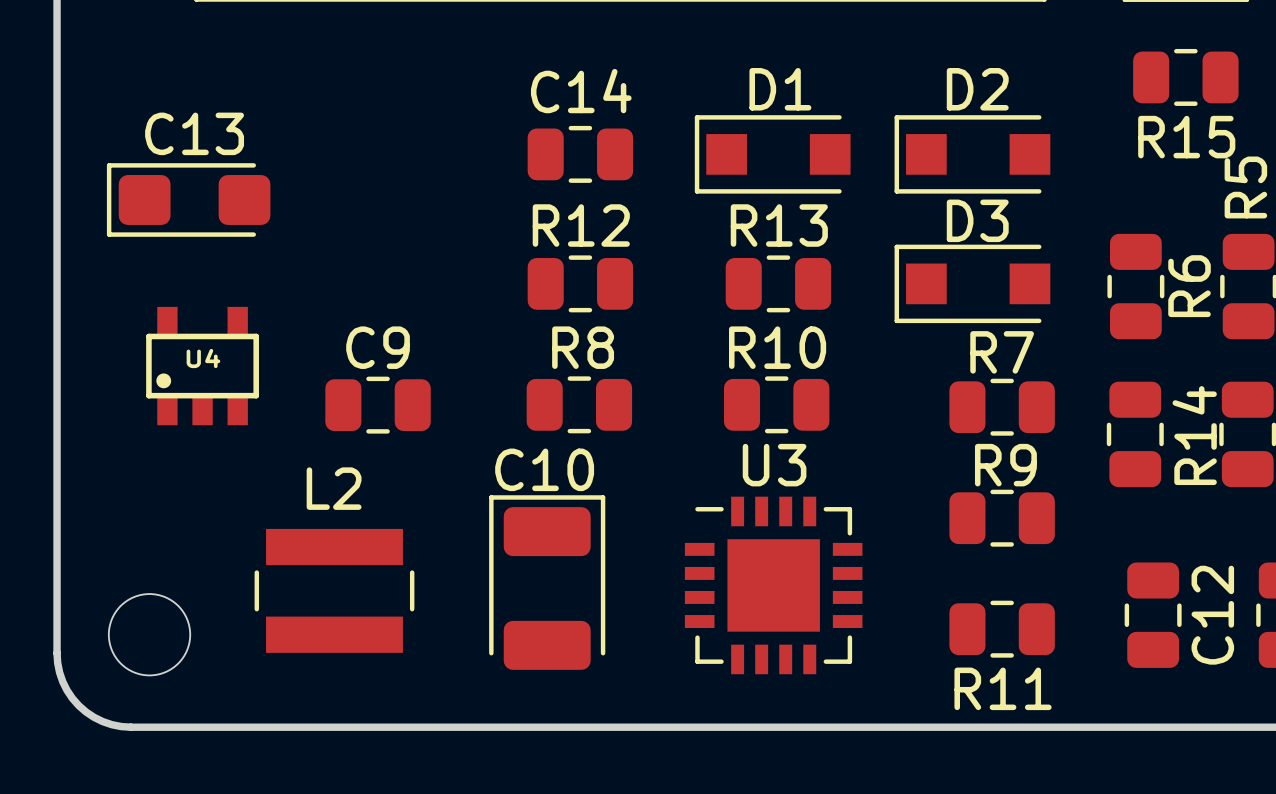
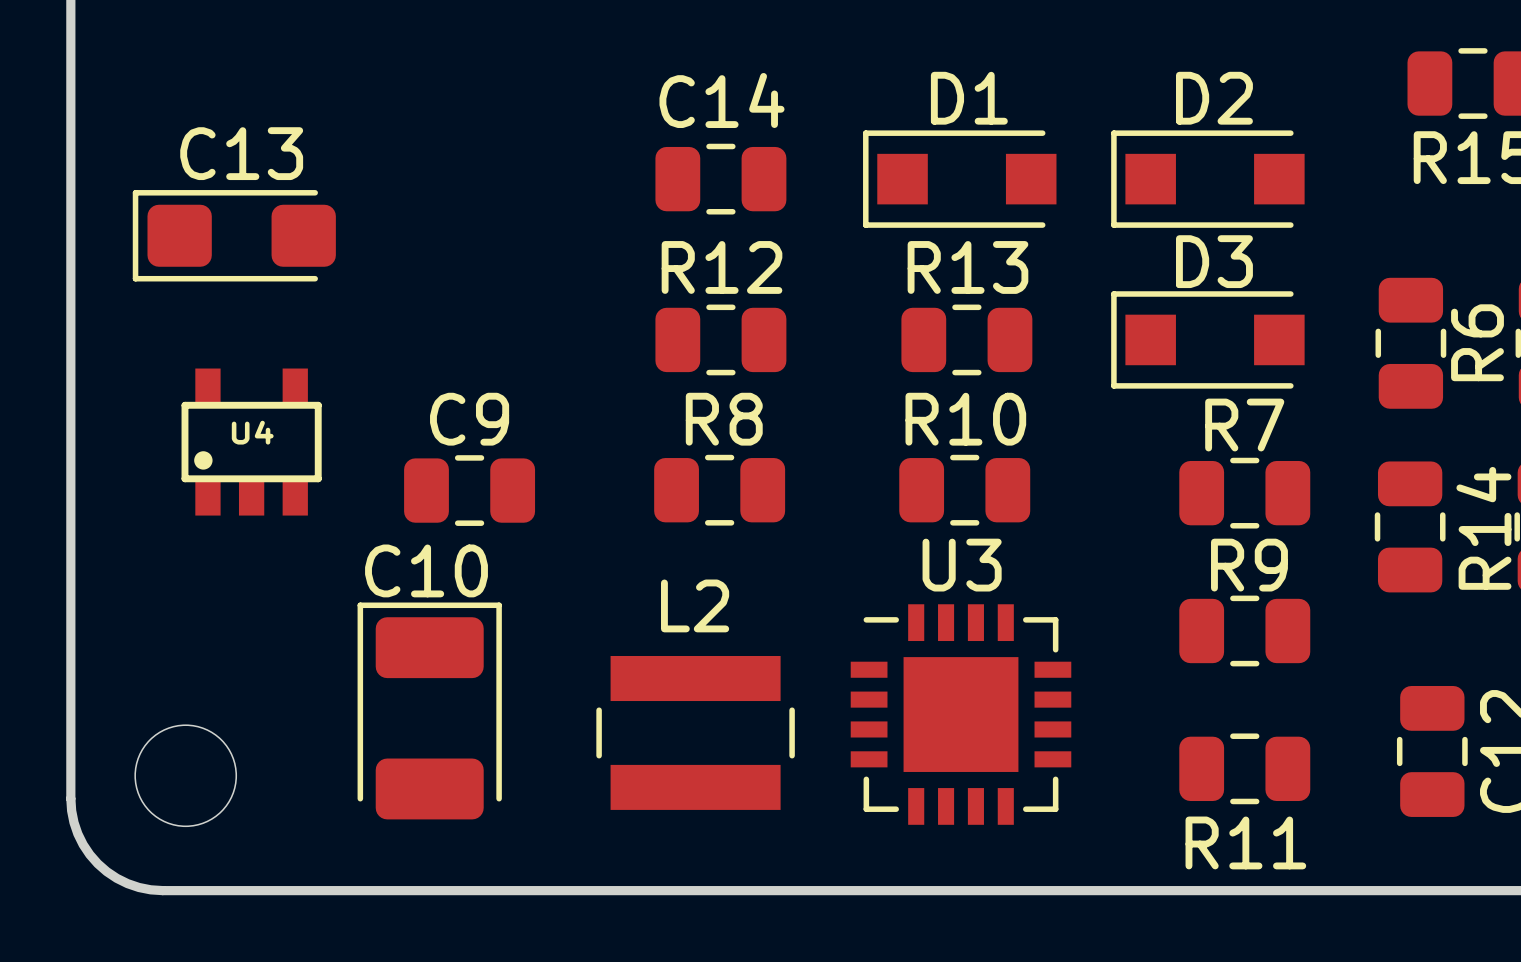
C10 position: (547, 582) -> (429, 710)
L2 position: (334, 590) -> (695, 732)

